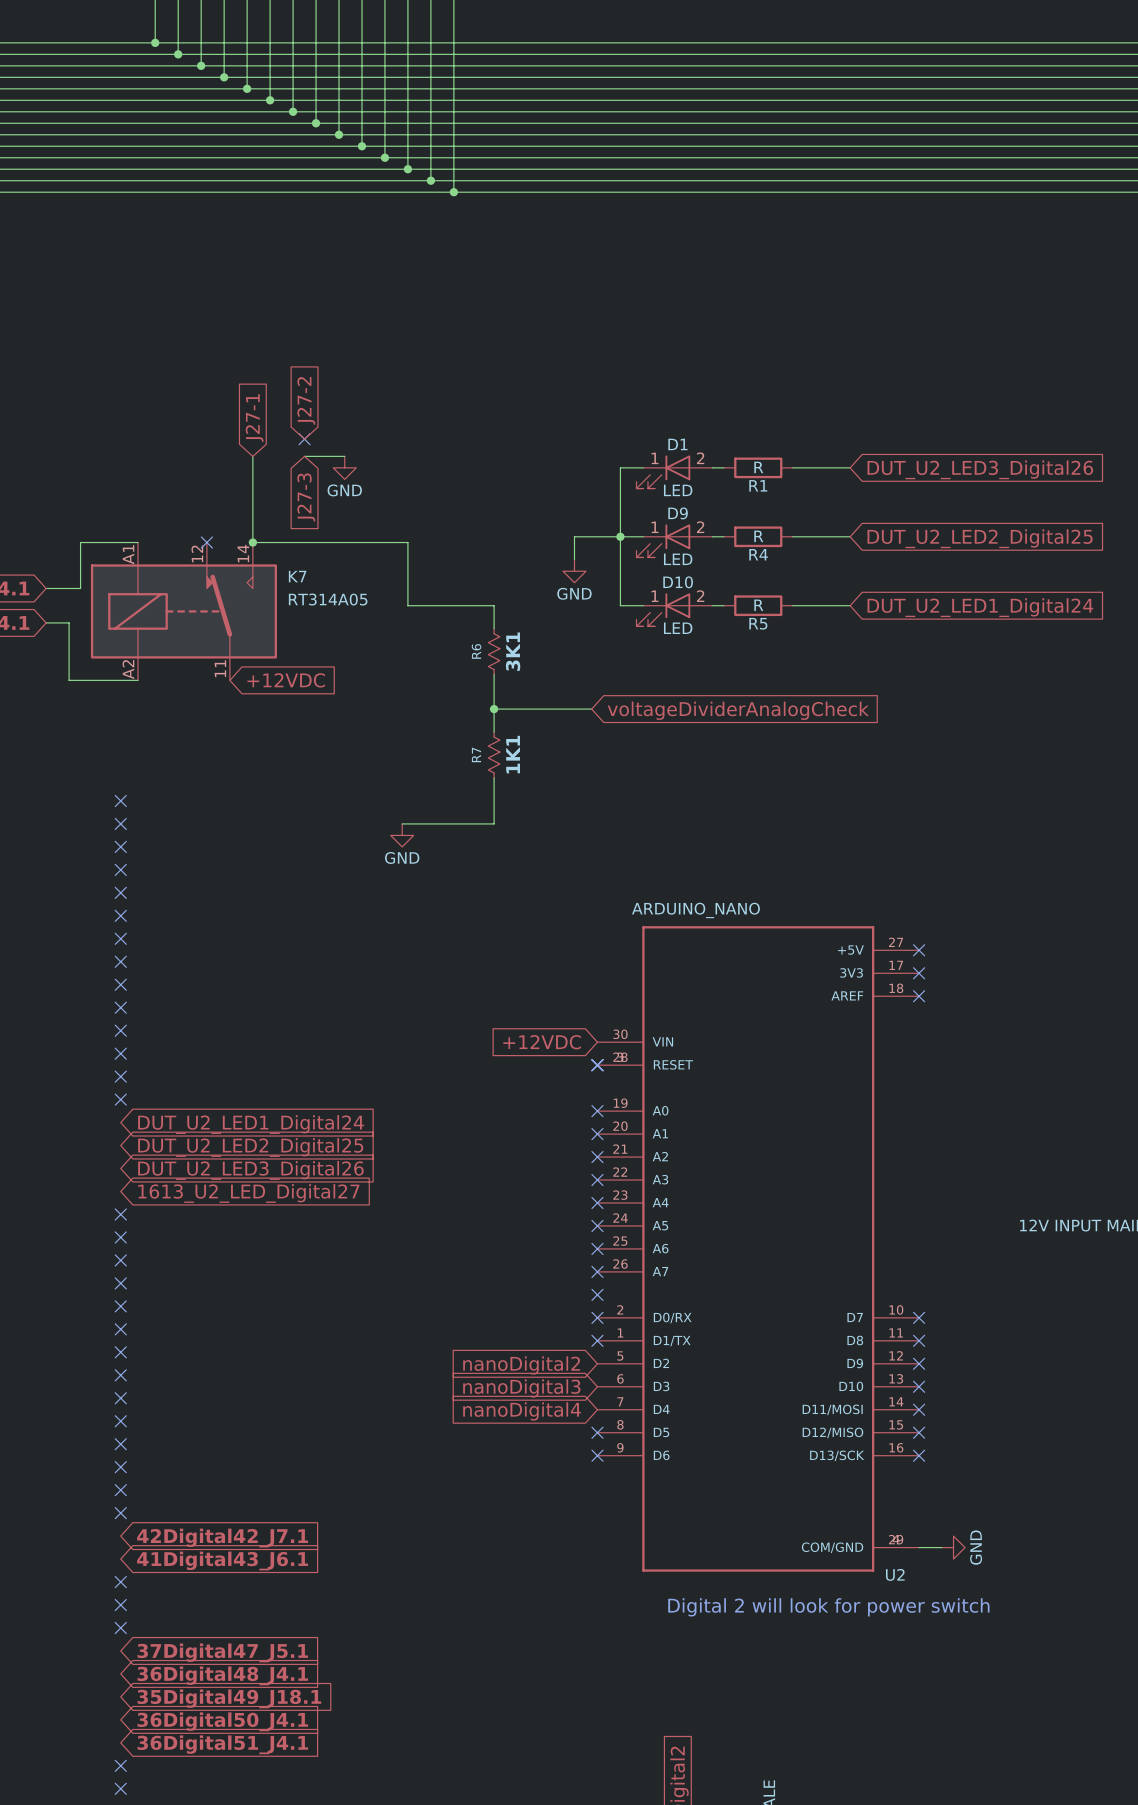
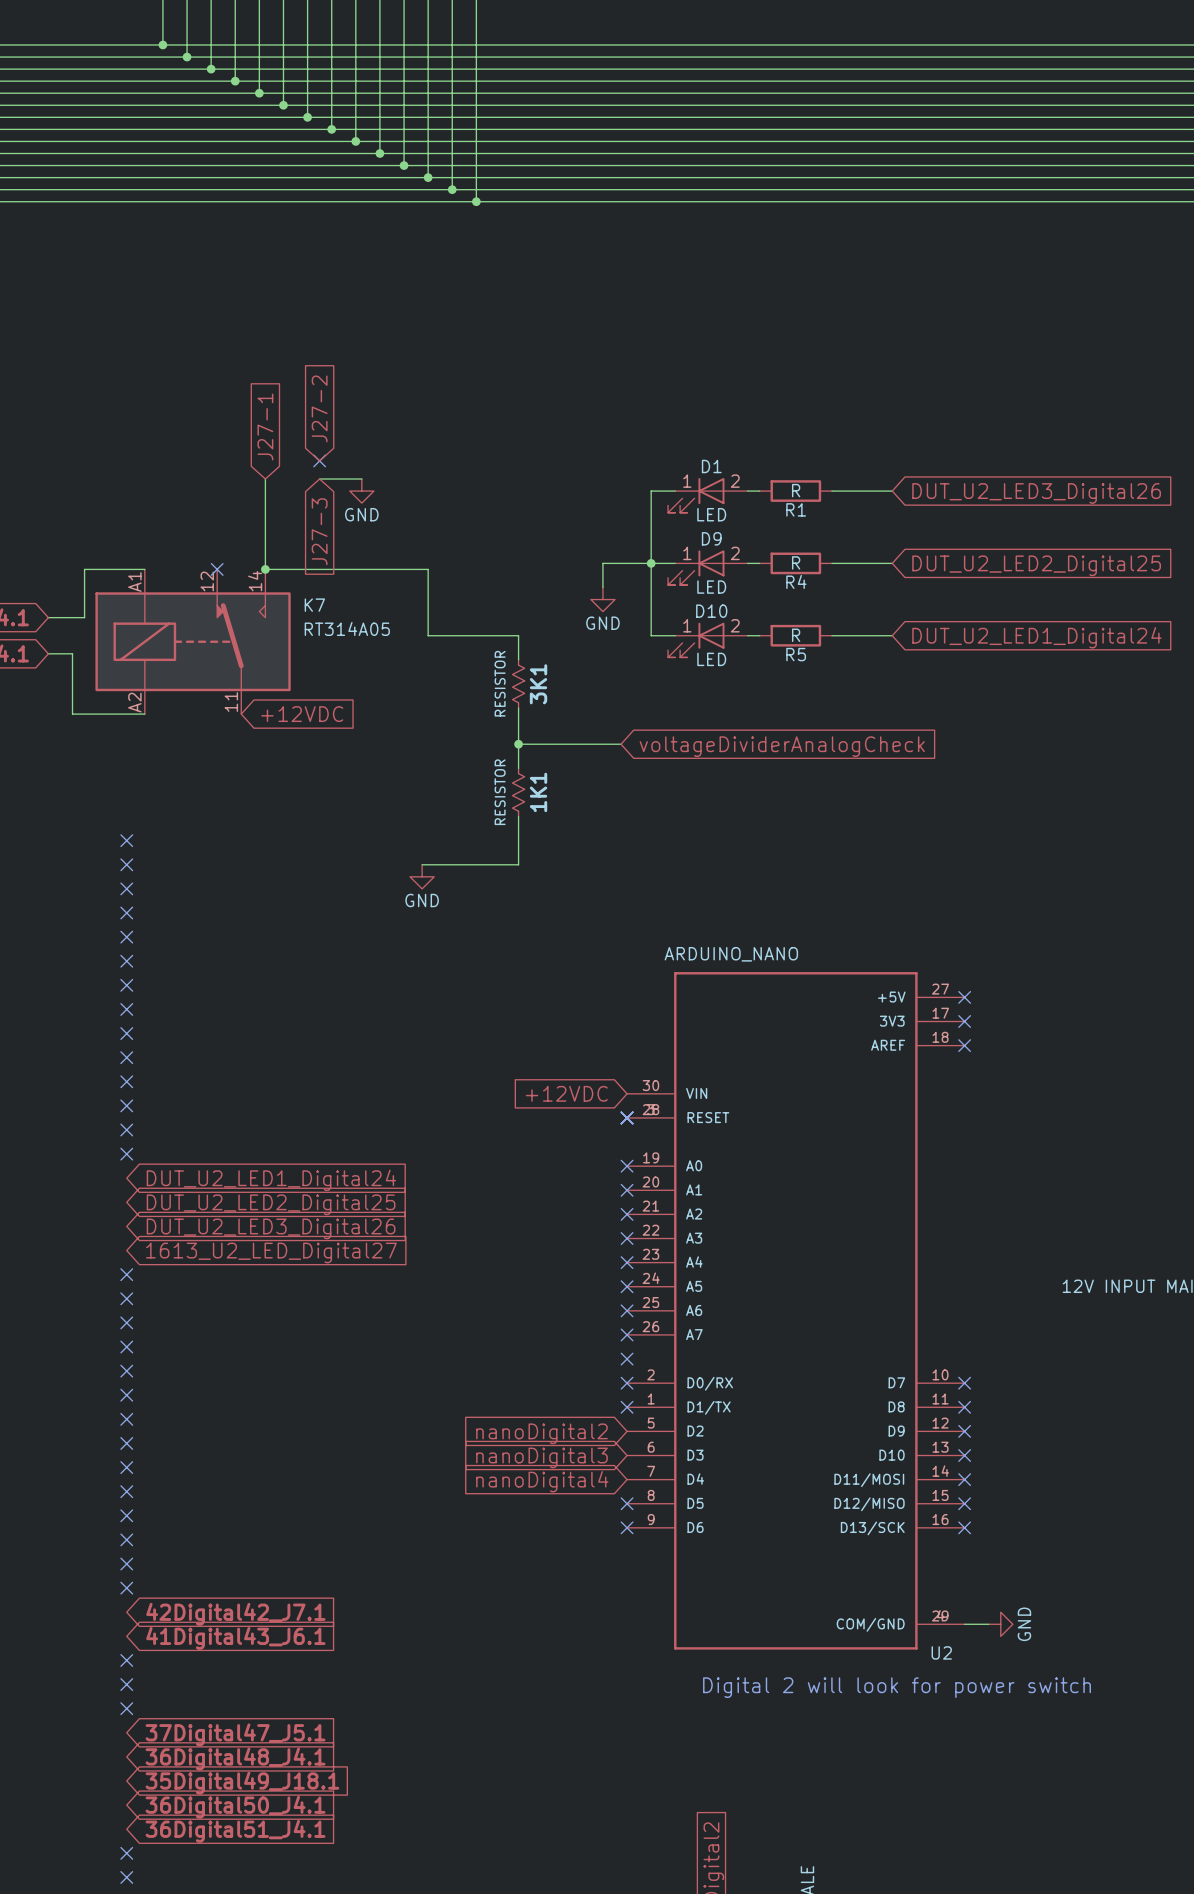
3K1 value: R6 (476, 651) -> RESISTOR (500, 683)
1K1 value: R7 (476, 754) -> RESISTOR (500, 792)

